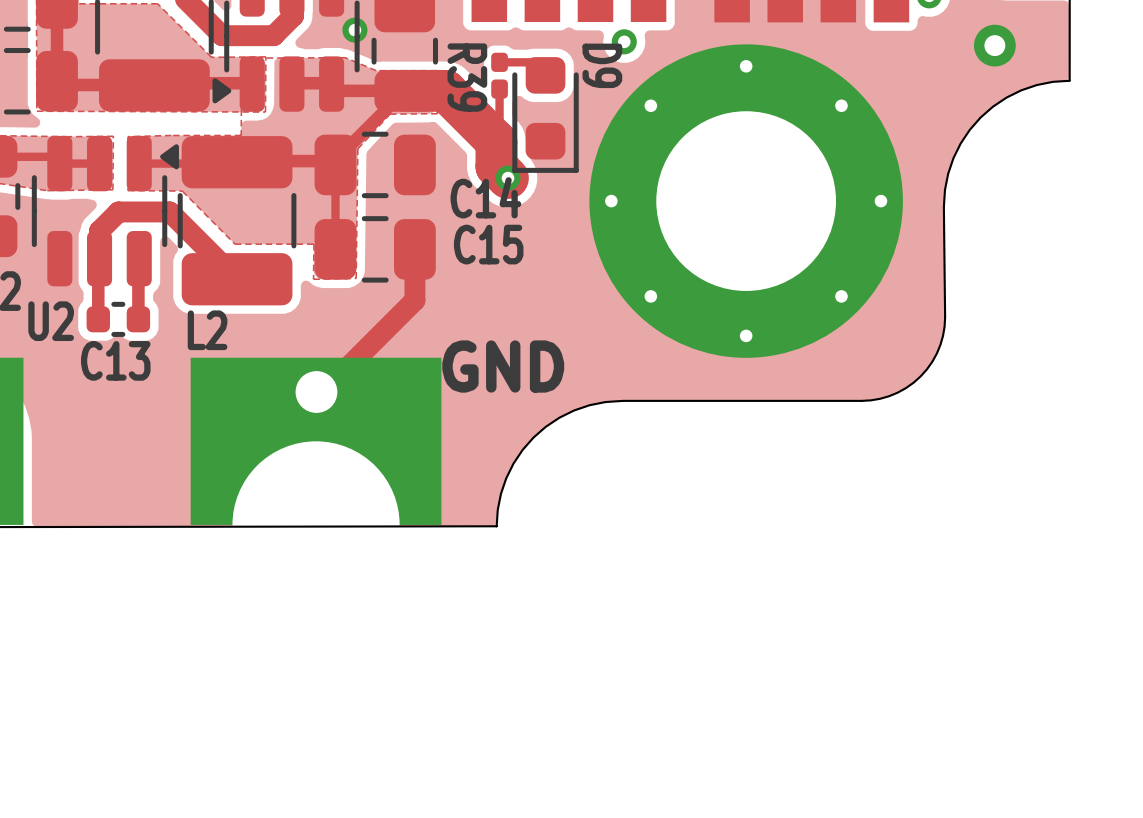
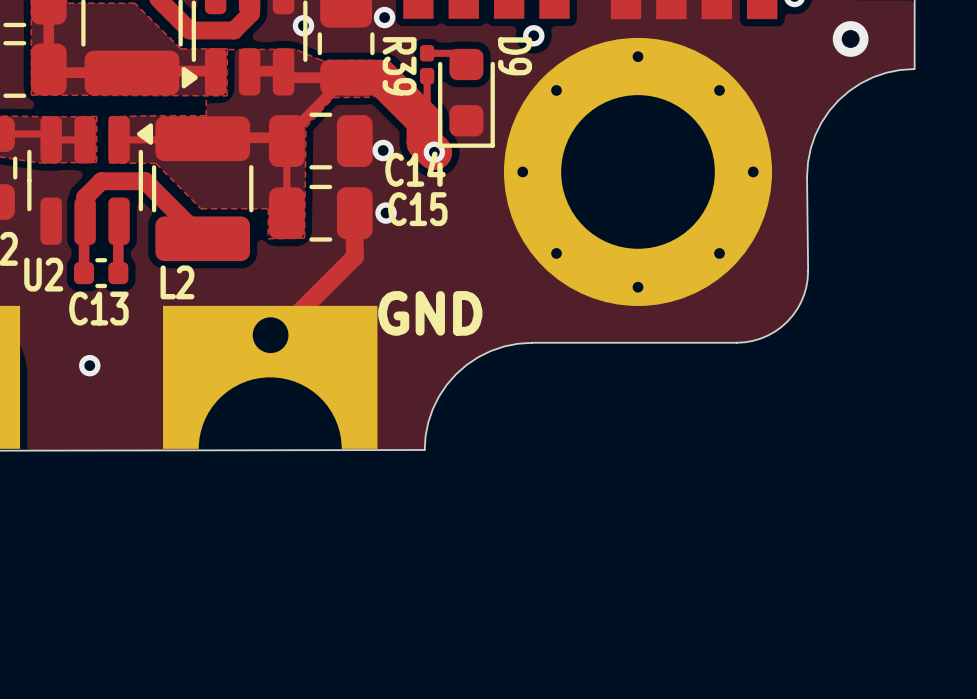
via: none -> (384, 17)
via: none -> (383, 150)
via: none -> (386, 213)
via: none -> (89, 365)

